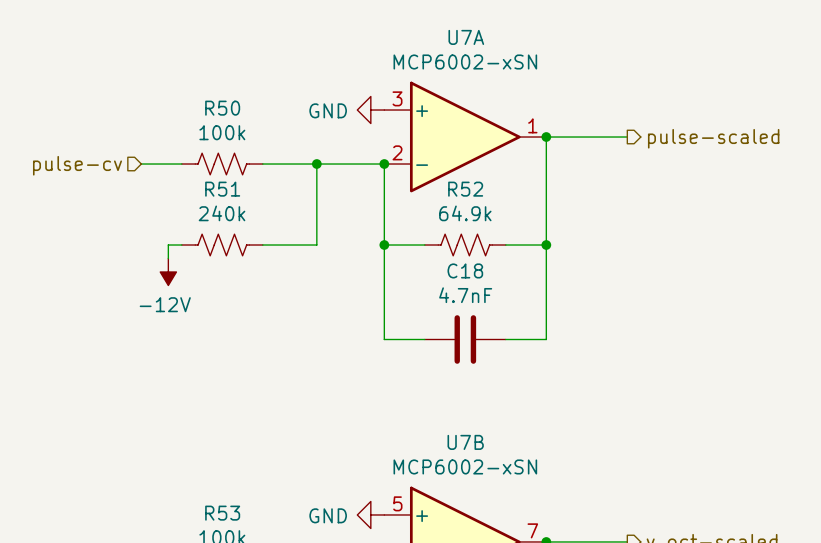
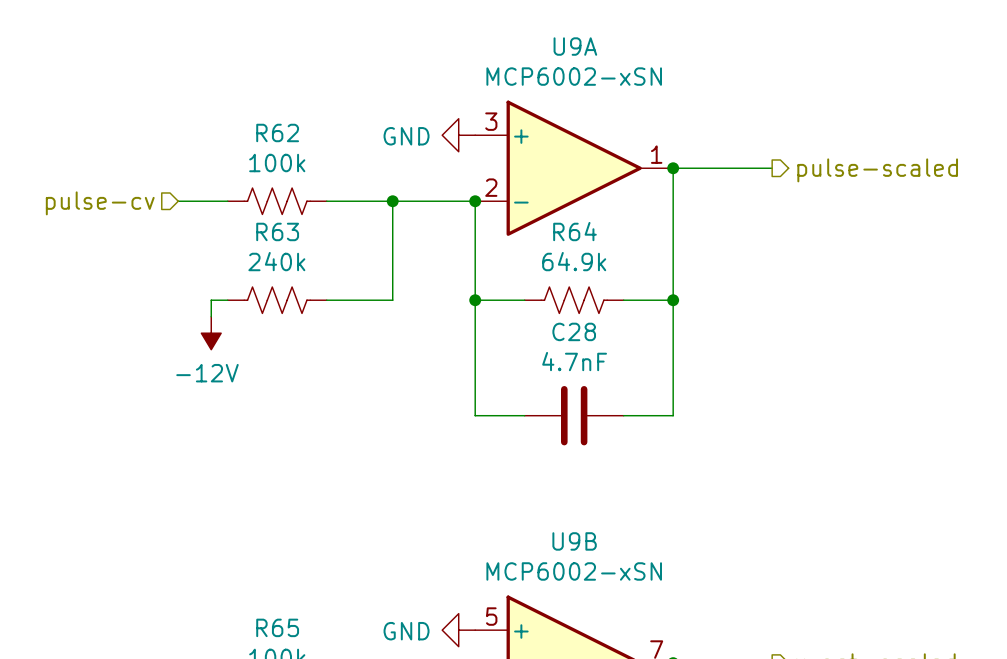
U7A name: U7A (466, 37) -> U9A (575, 46)
R50 name: R50 (222, 108) -> R62 (277, 132)
R51 name: R51 (222, 189) -> R63 (277, 231)
R52 name: R52 (465, 189) -> R64 (574, 231)
C18 name: C18 (465, 270) -> C28 (574, 331)
U7B name: U7B (465, 442) -> U9B (574, 541)
R53 name: R53 (222, 513) -> R65 (277, 627)

